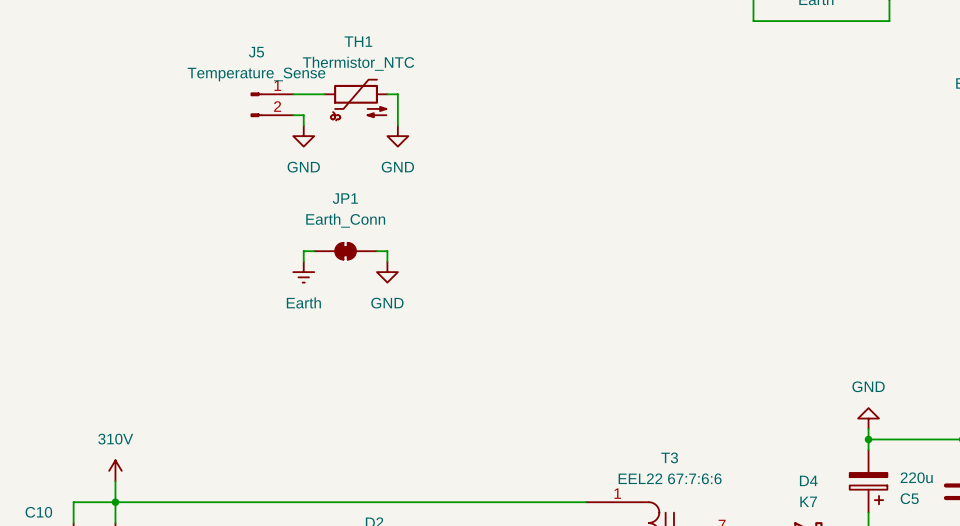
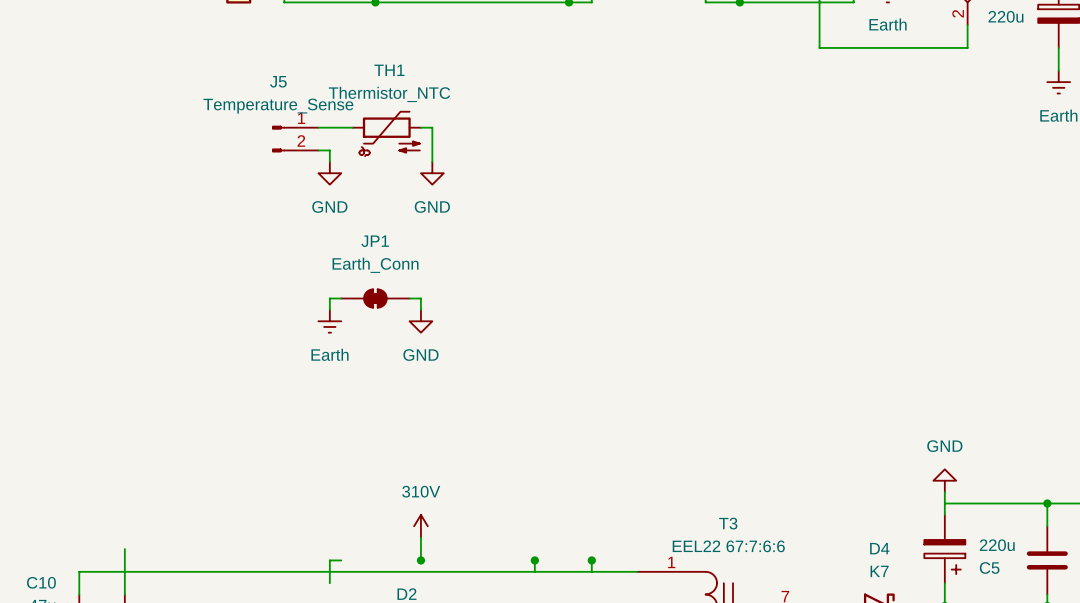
junction: (868, 439) -> none
power symbol: none -> 310V (420, 526)
power symbol: 310V (115, 470) -> none
wire: none -> (420, 537) (420, 560)
wire: none -> (341, 560) (329, 560) (329, 583)
junction: none -> (420, 560)
wire: none -> (534, 560) (534, 571)
junction: none -> (534, 560)
wire: none -> (591, 560) (591, 571)
junction: none -> (591, 560)
junction: (115, 502) -> none

